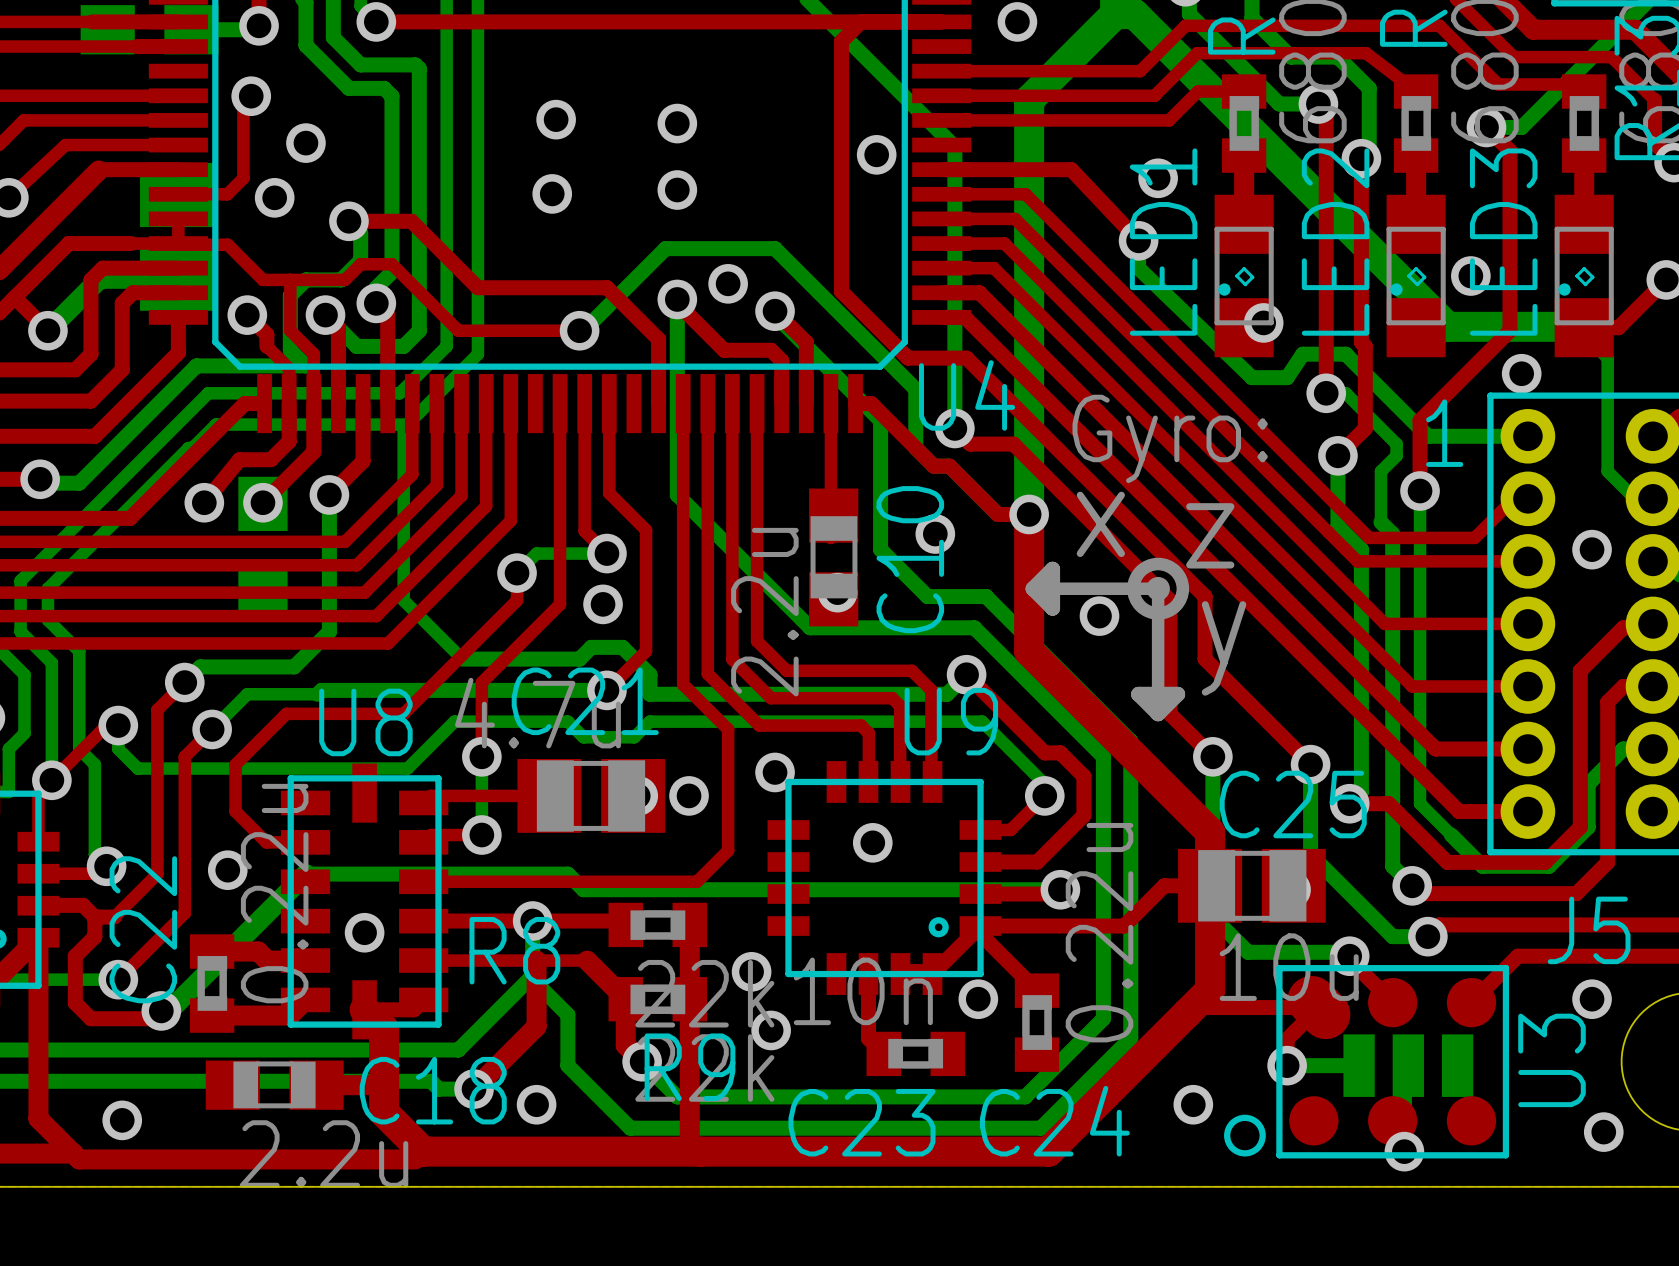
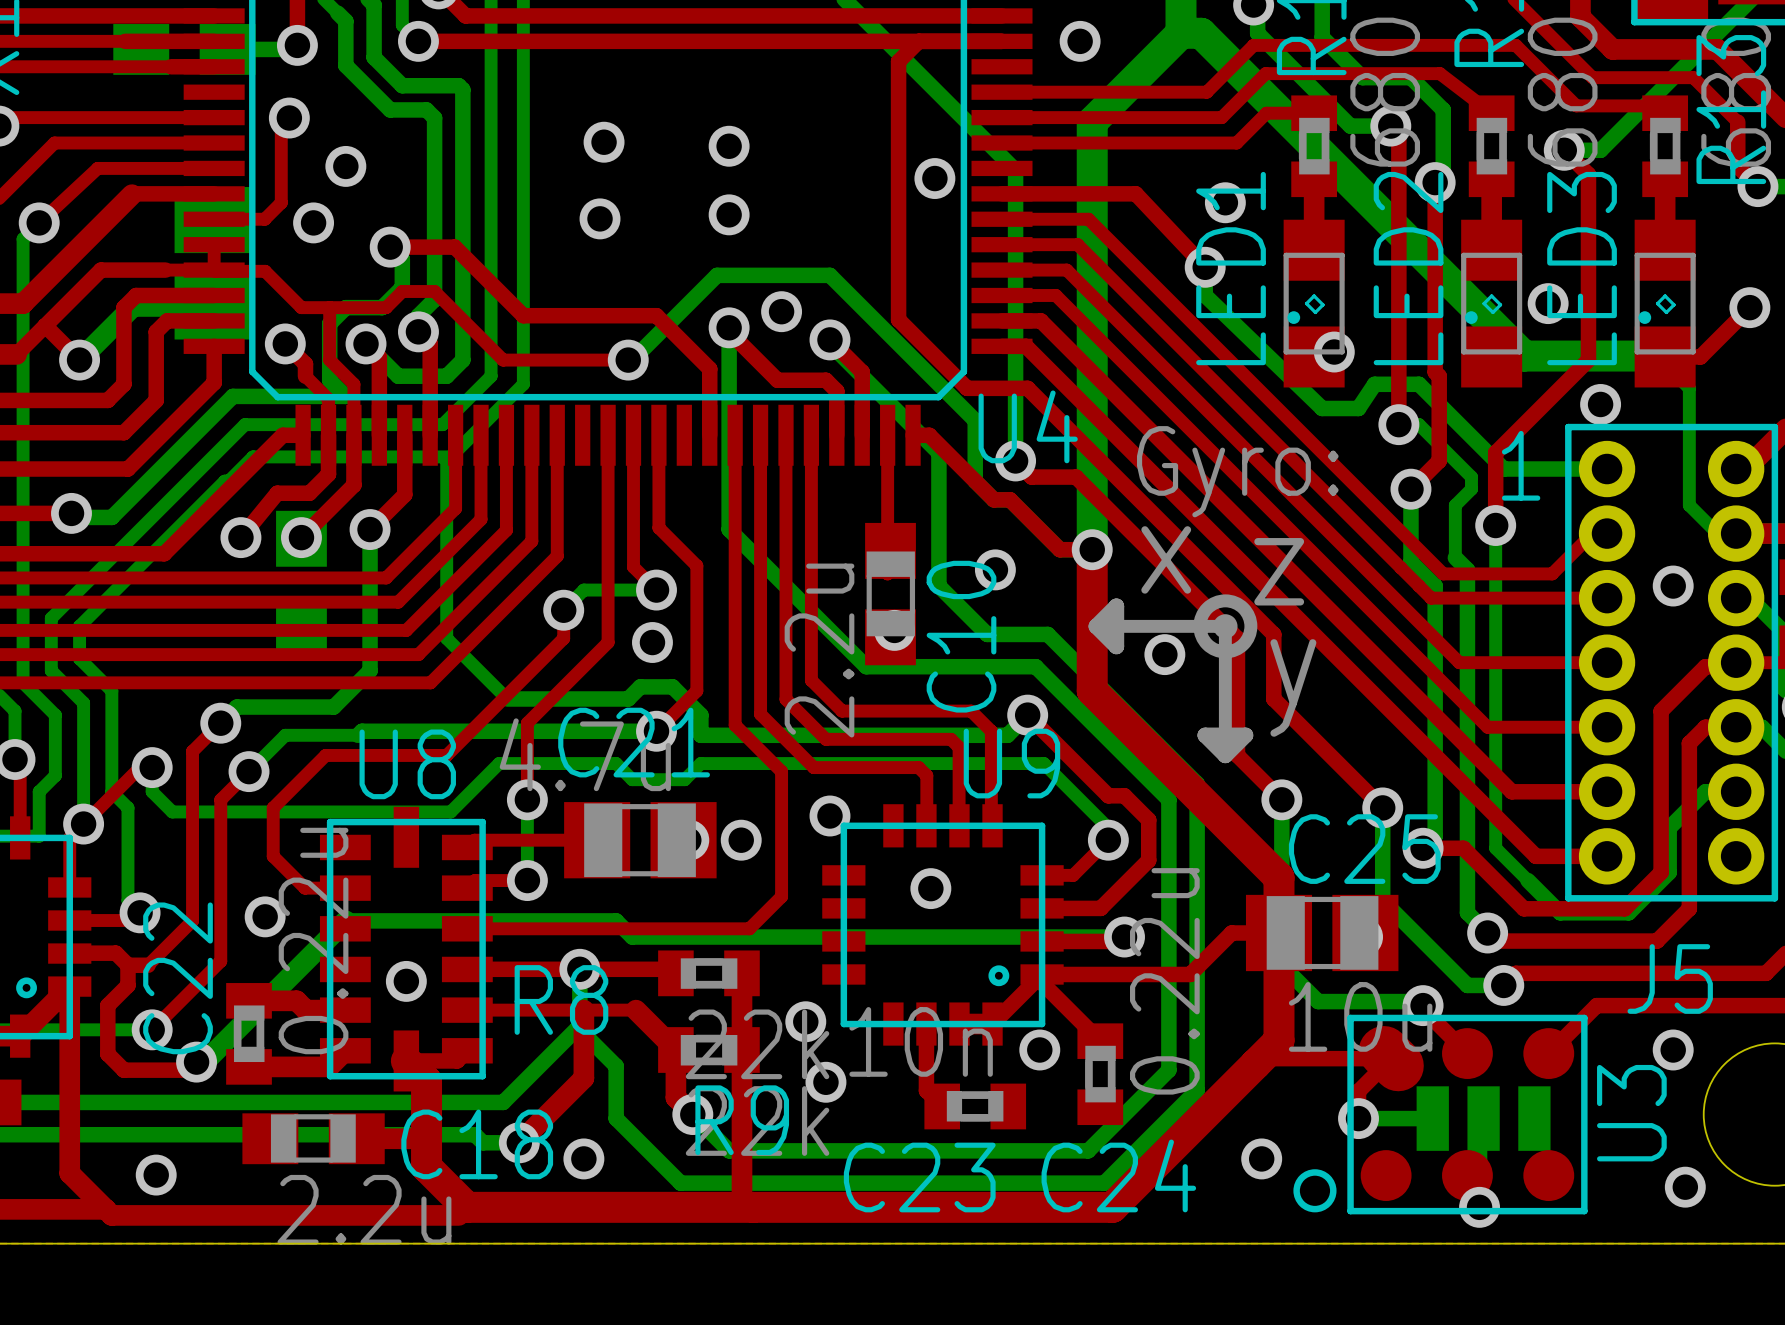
C10 name position: C10 (910, 559) -> C10 (961, 636)

